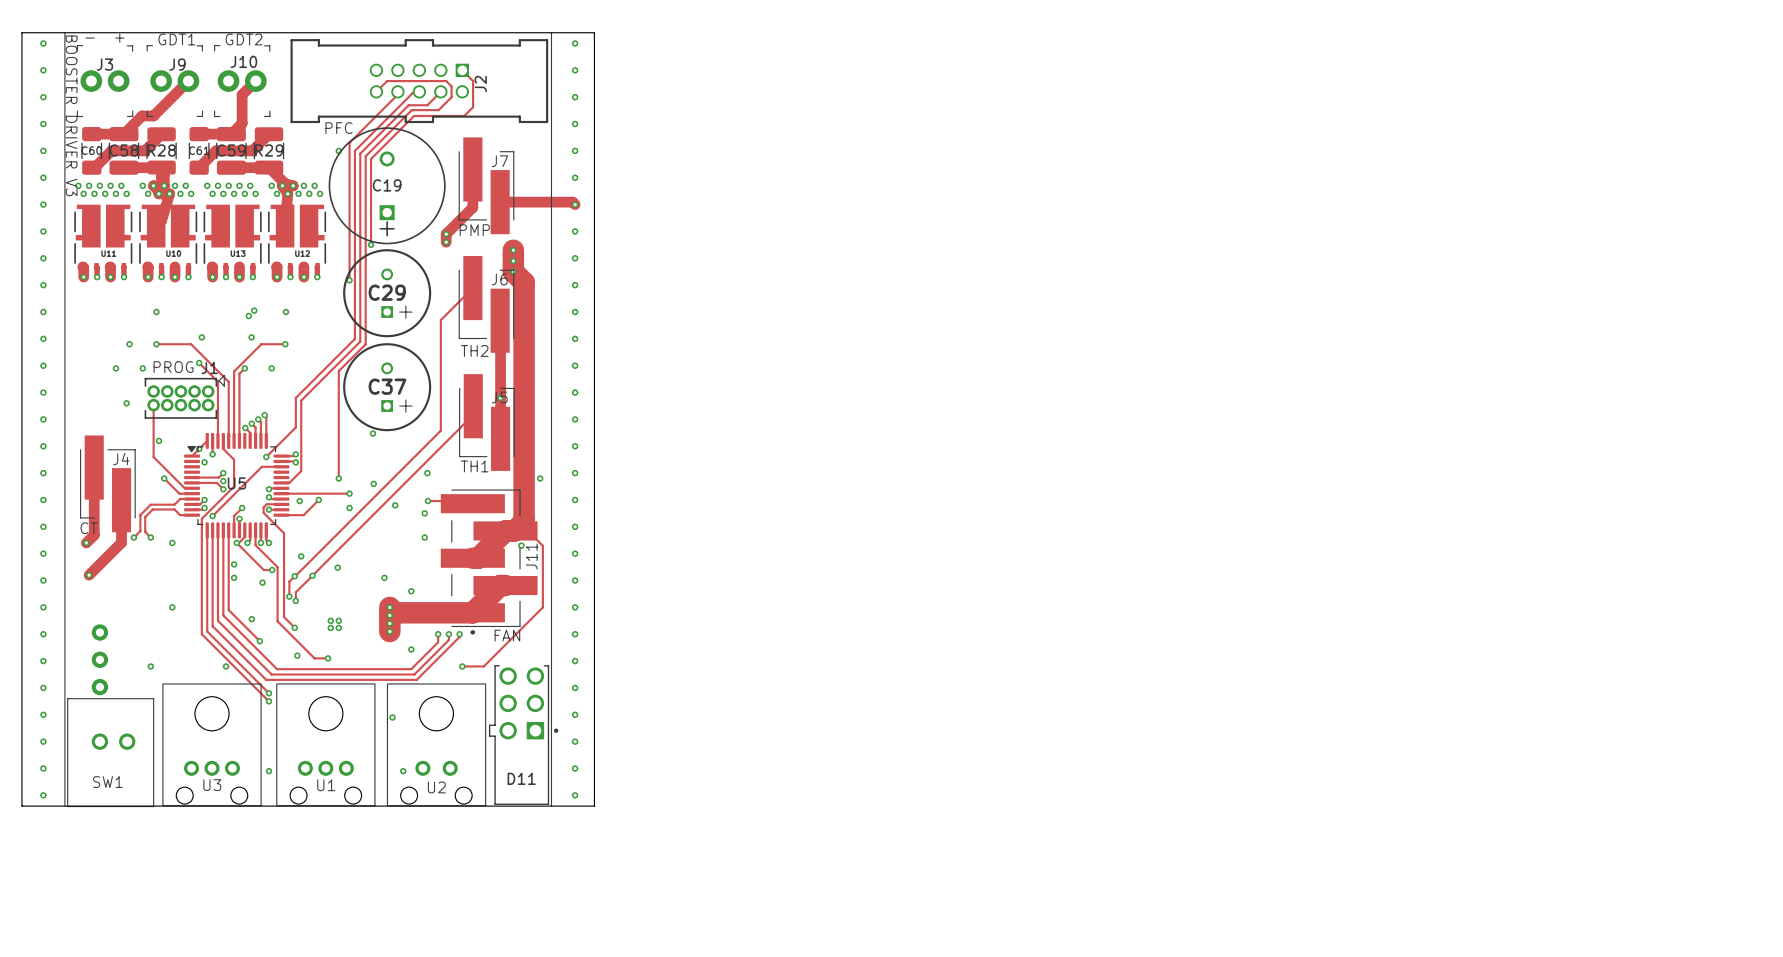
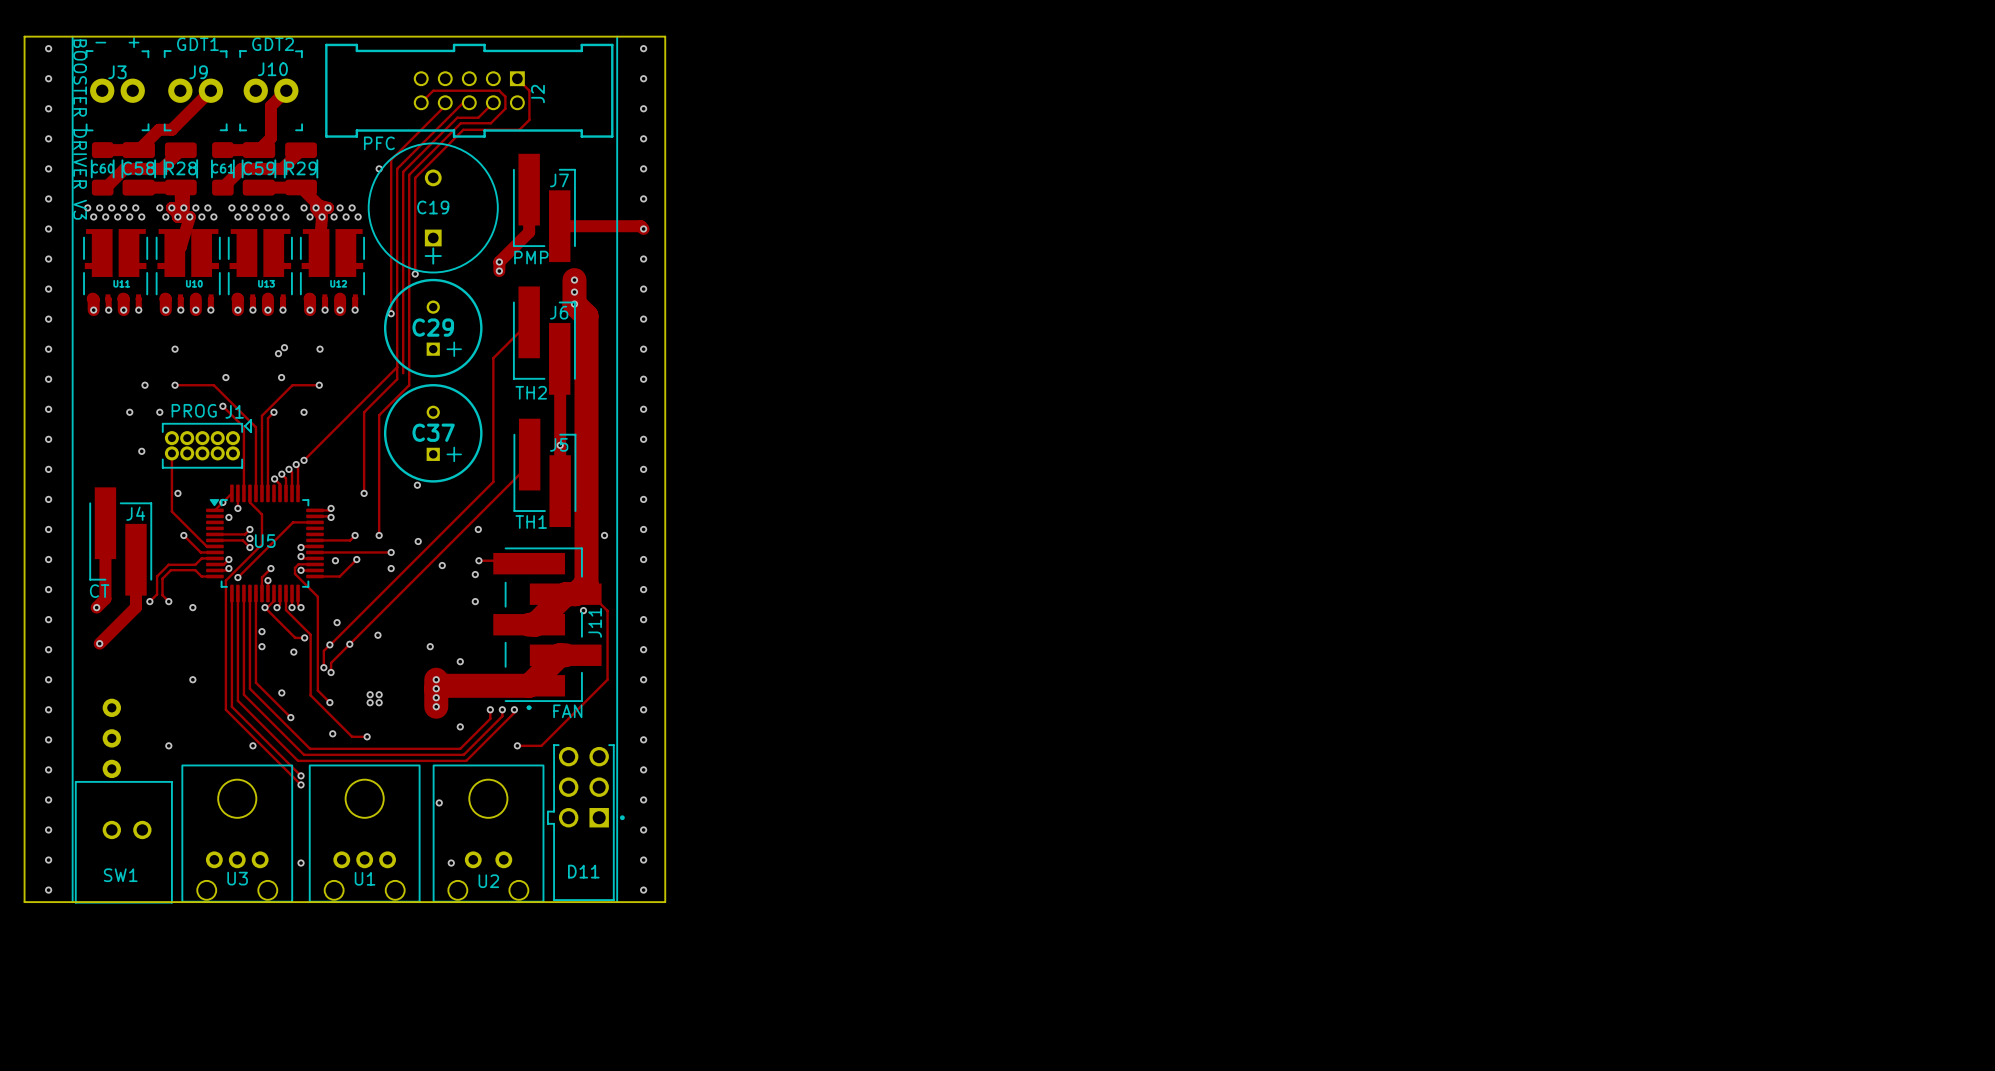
track: none -> (397, 367) (304, 460)
track: (360, 333) (360, 341) (301, 400) (301, 471) (289, 482) -> (355, 535) (350, 540) (323, 540)
track: (325, 368) (295, 397) (295, 427) (266, 457) -> (364, 412) (364, 493)
via: none -> (304, 460)
via: none -> (364, 493)
via: (266, 457) -> none
via: none -> (355, 535)

